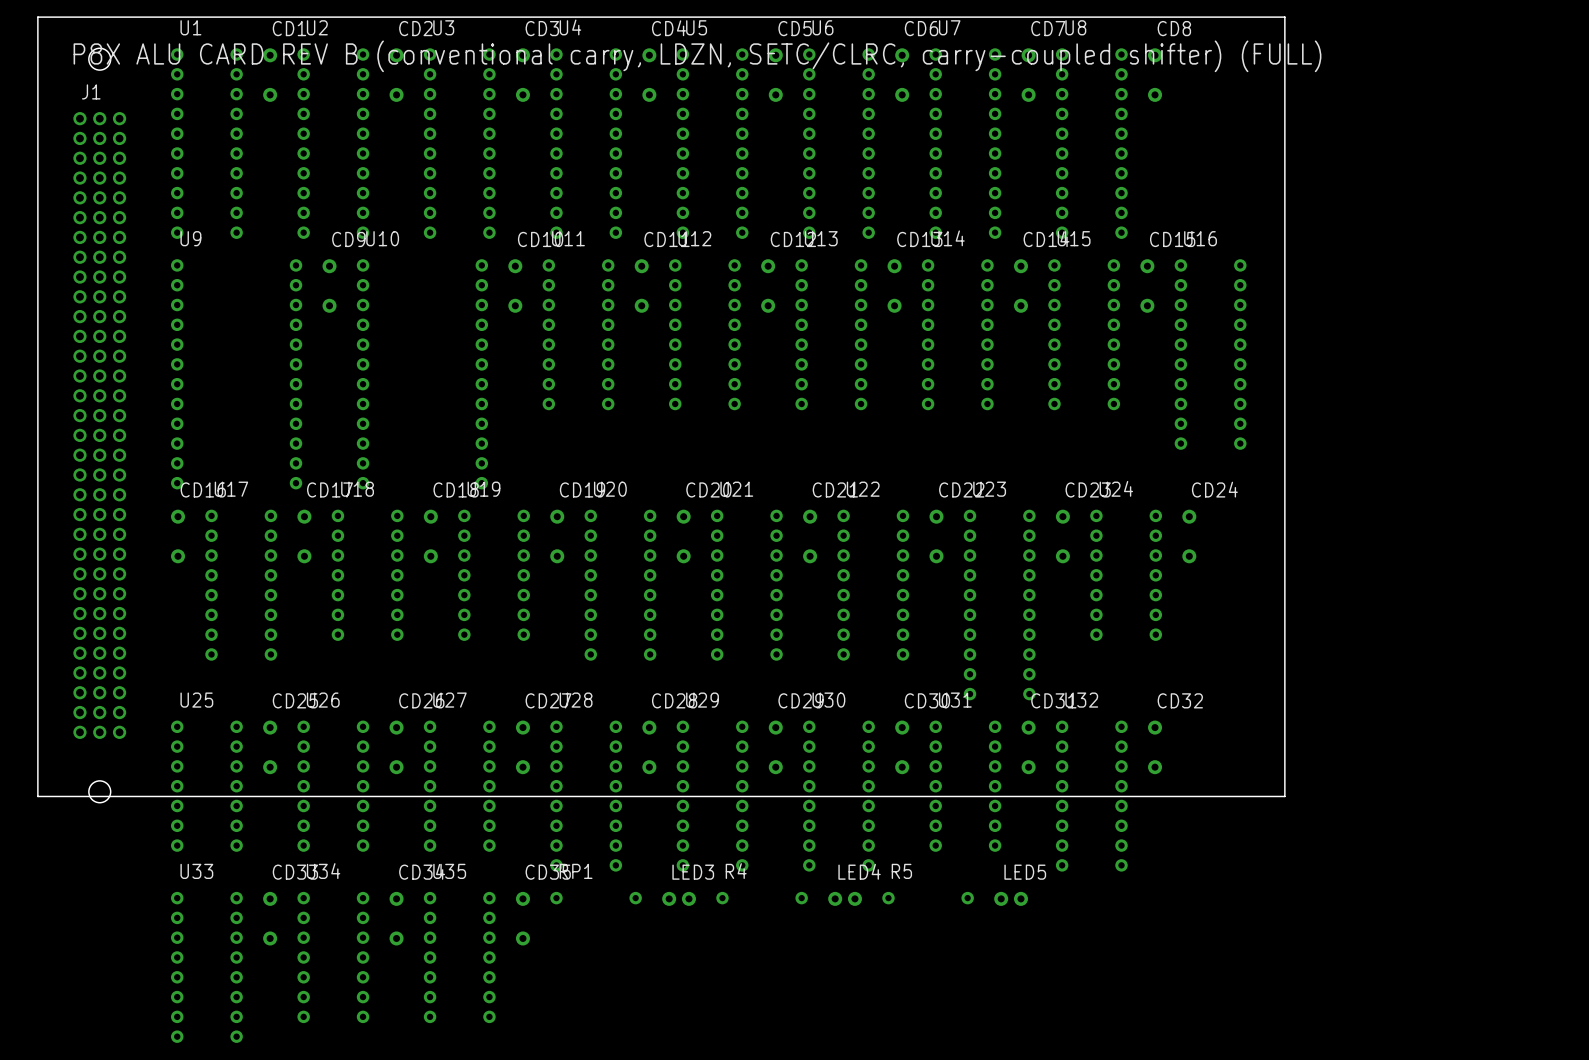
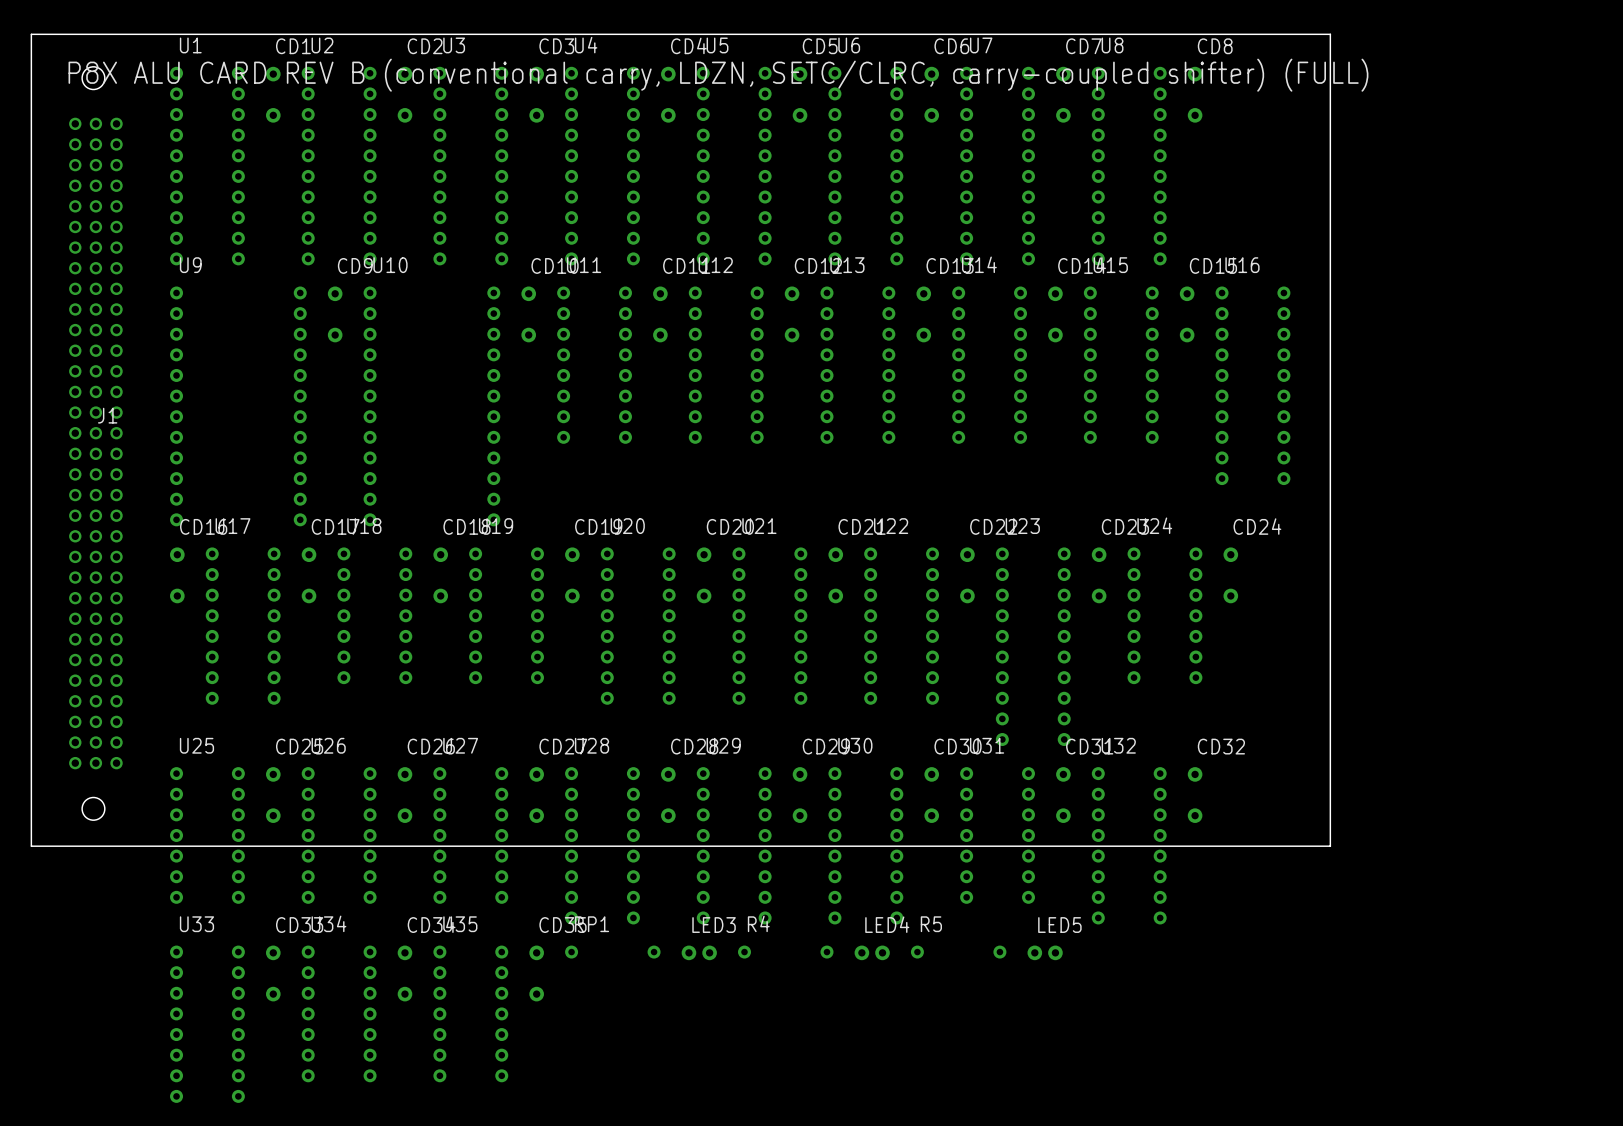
J1 footprint: [73, 48, 127, 803] -> [69, 66, 123, 821]
J1 name position: J1 (91, 91) -> J1 (107, 415)

